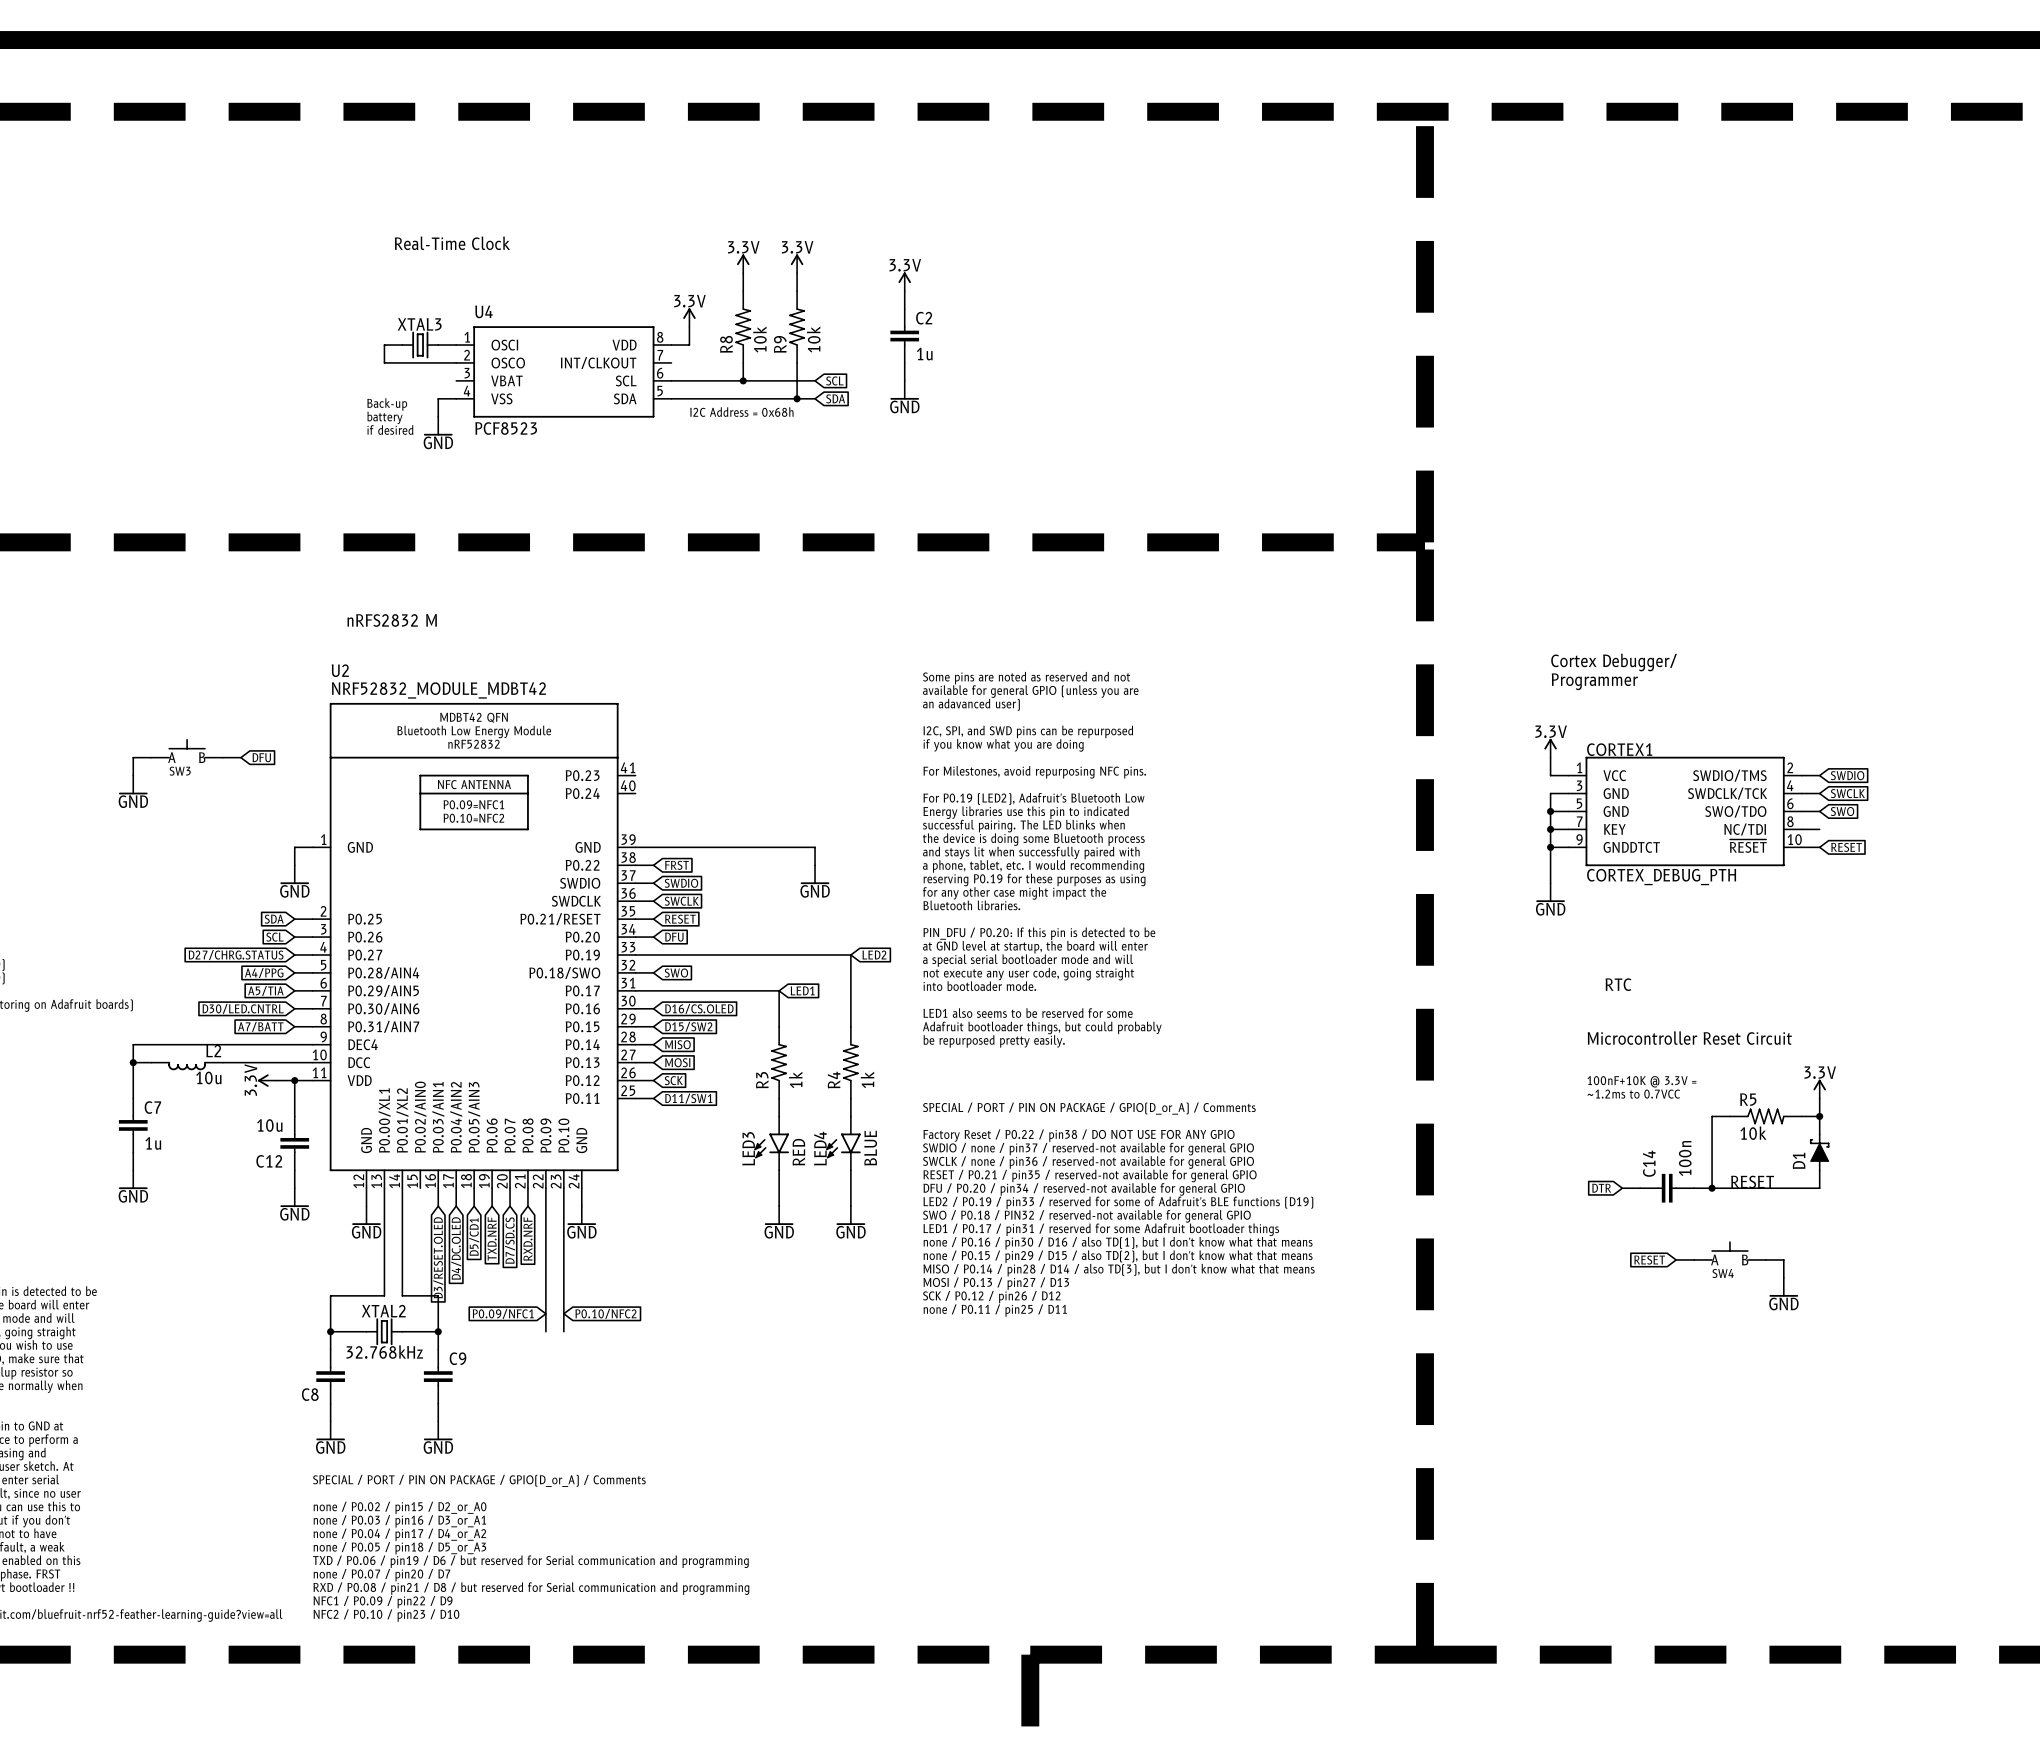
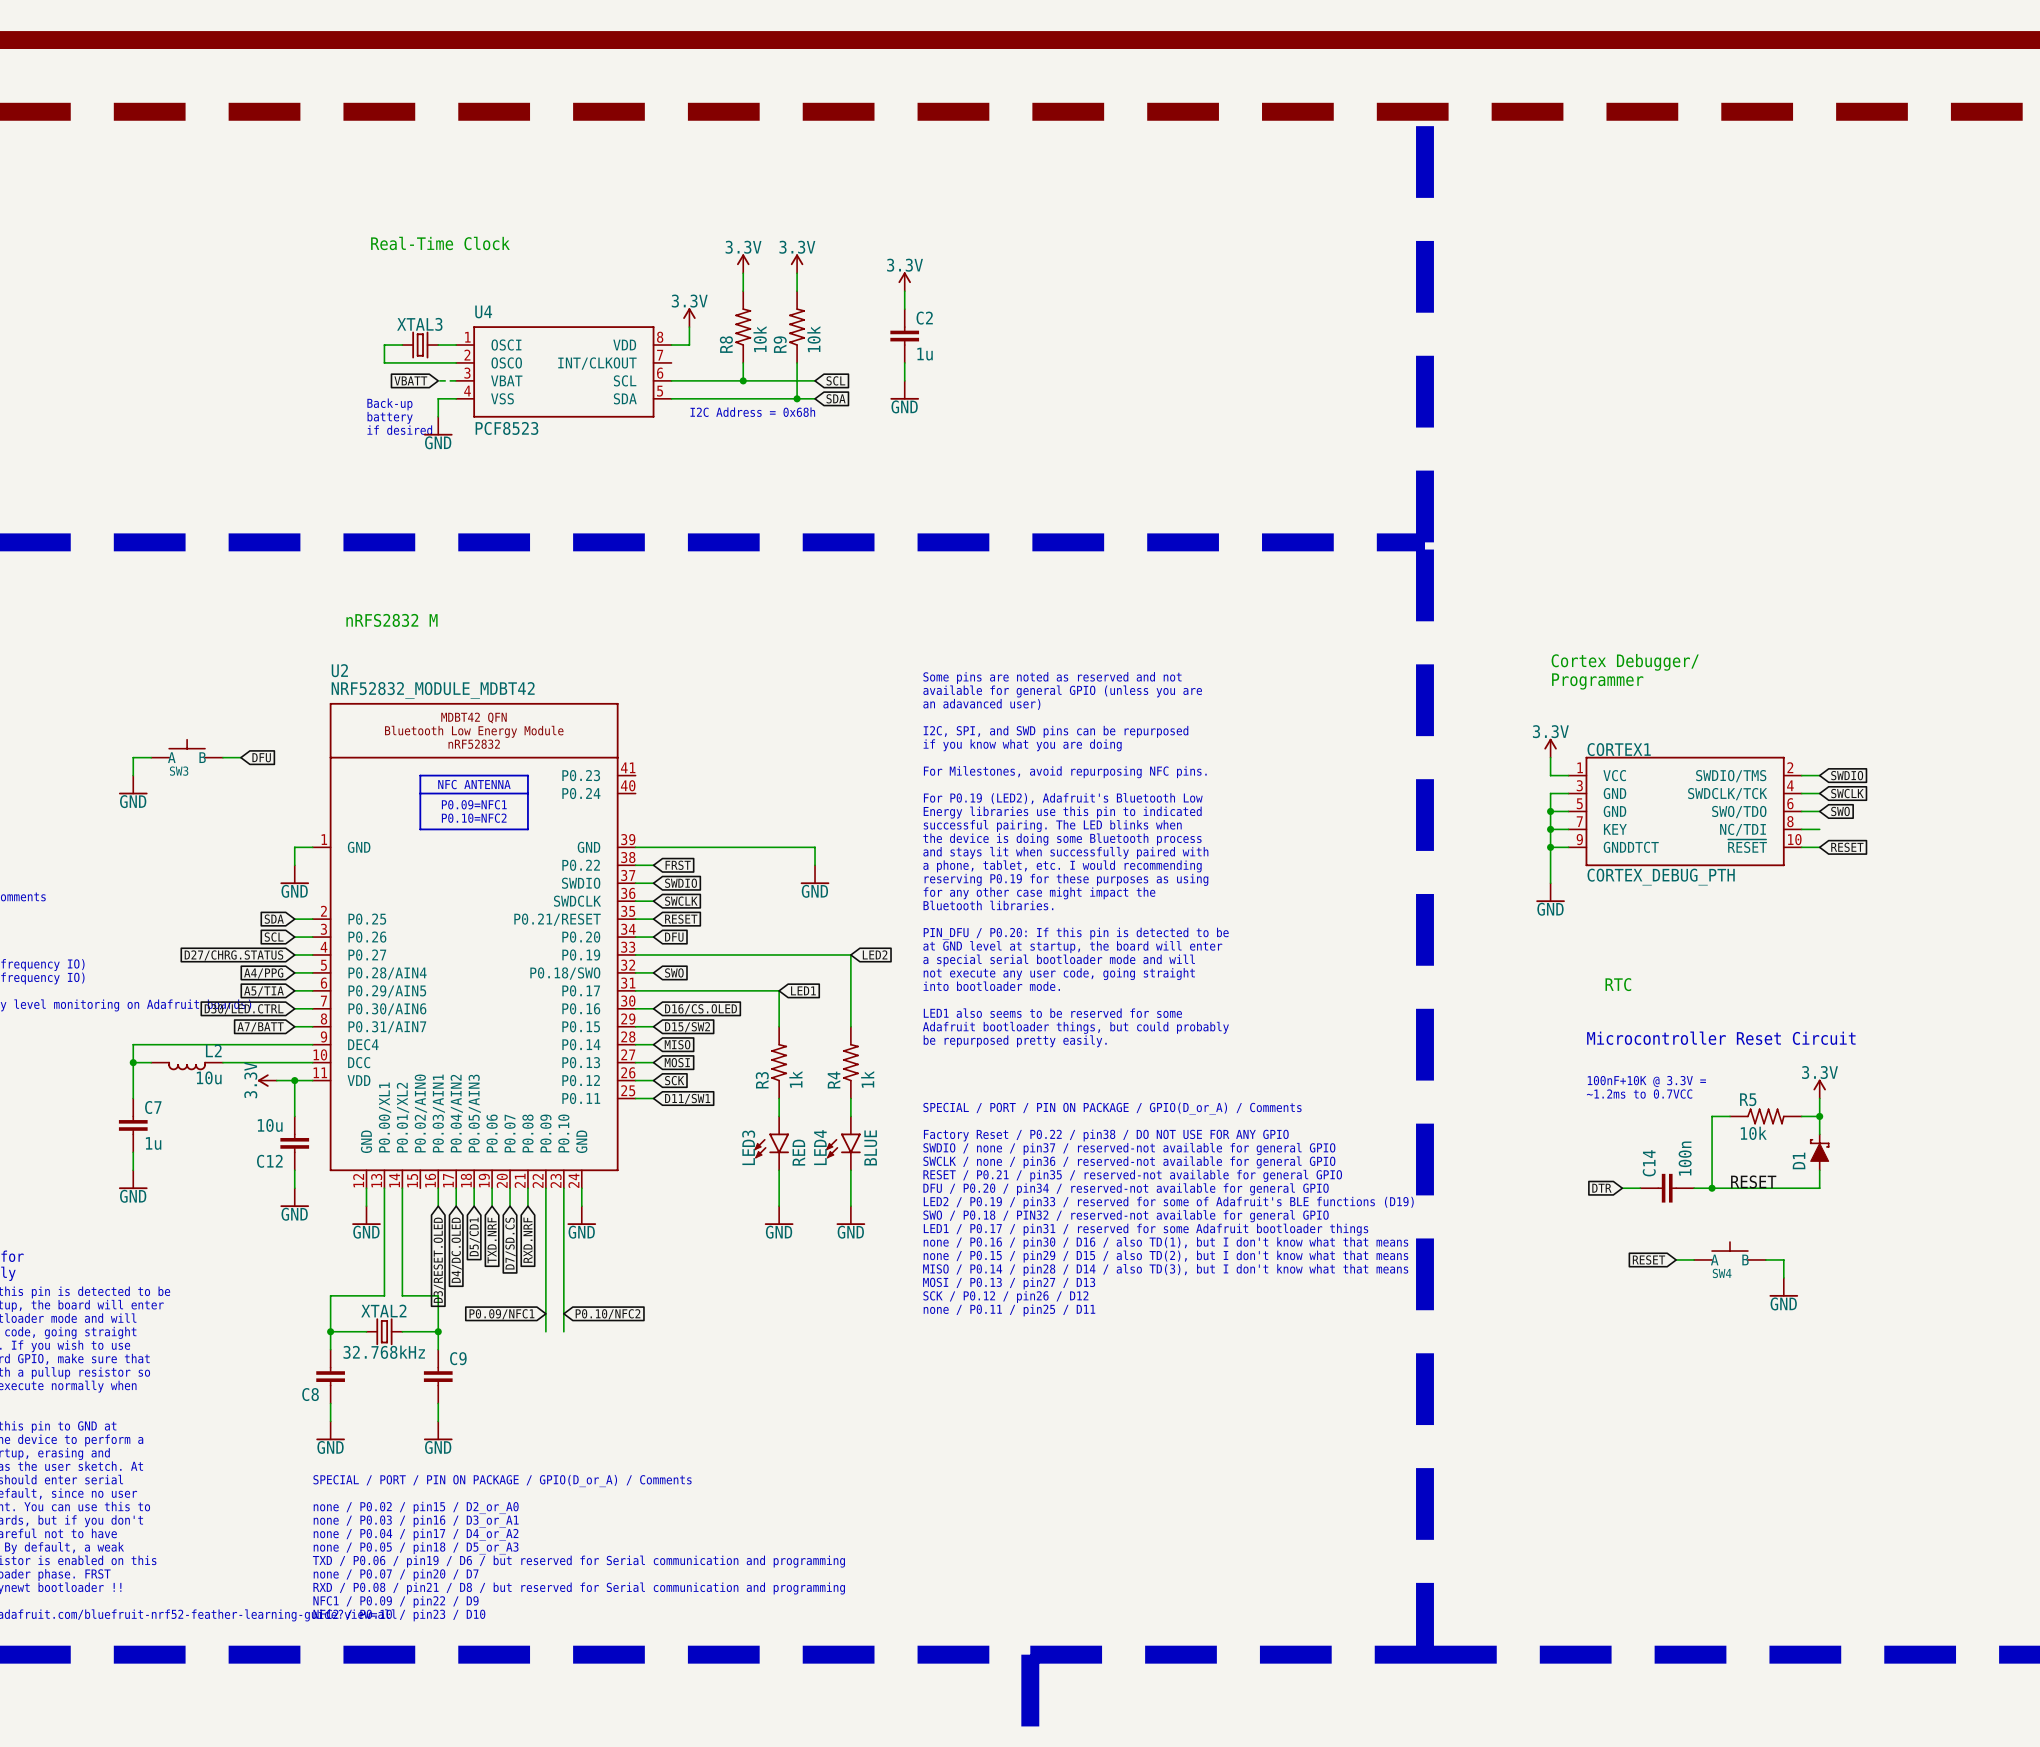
global label: none -> VBATT (410, 380)
wire: none -> (438, 380) (456, 380)
global label: D30/LED.CNTRL (243, 1008) -> D30/LED.CTRL (244, 1009)

